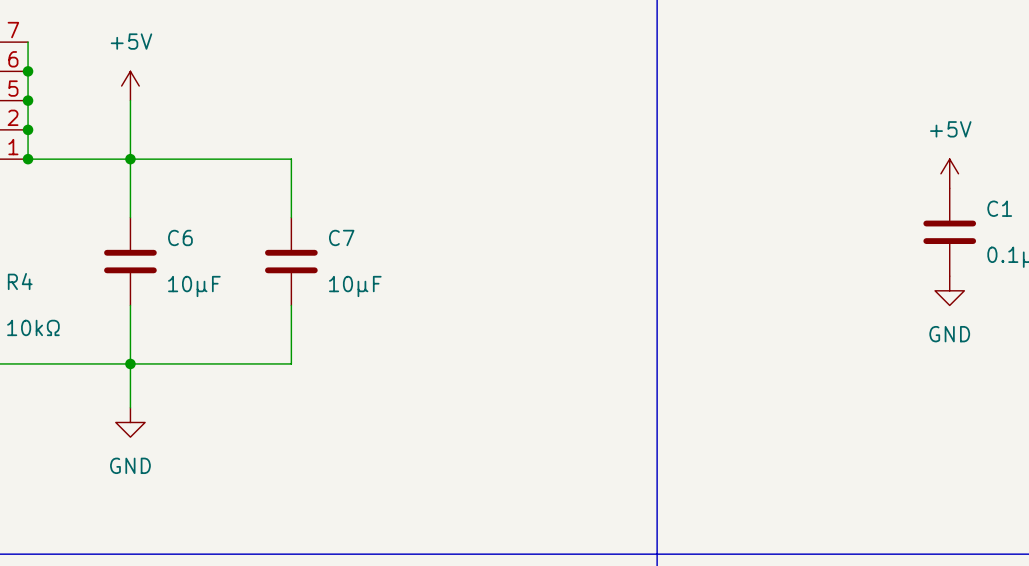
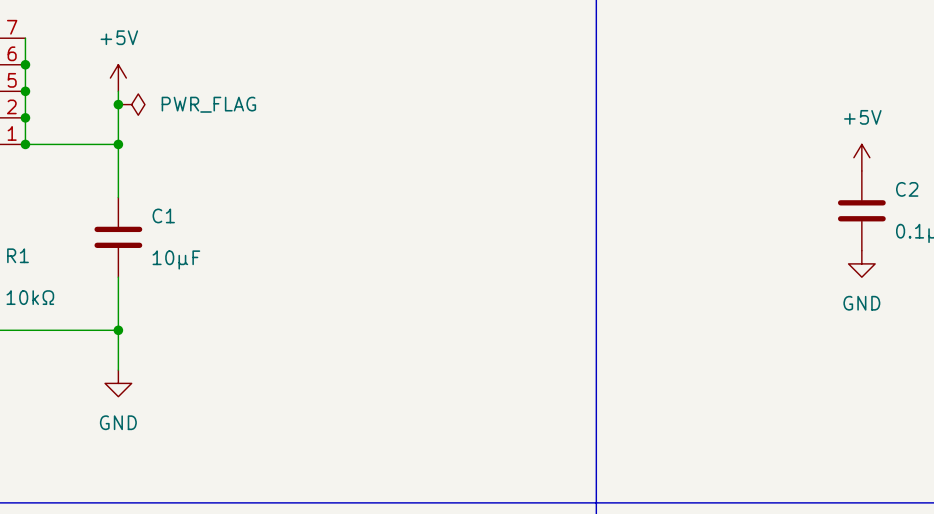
junction: none -> (118, 104)
power symbol: none -> PWR_FLAG (131, 104)
wire: (130, 159) (291, 159) (291, 217) -> none
C1 name: C1 (999, 208) -> C2 (907, 189)
C6 name: C6 (180, 237) -> C1 (163, 215)
C7: 10µF (291, 261) -> none
R4 name: R4 (20, 281) -> R1 (18, 255)
wire: (291, 305) (291, 363) (130, 363) -> none

